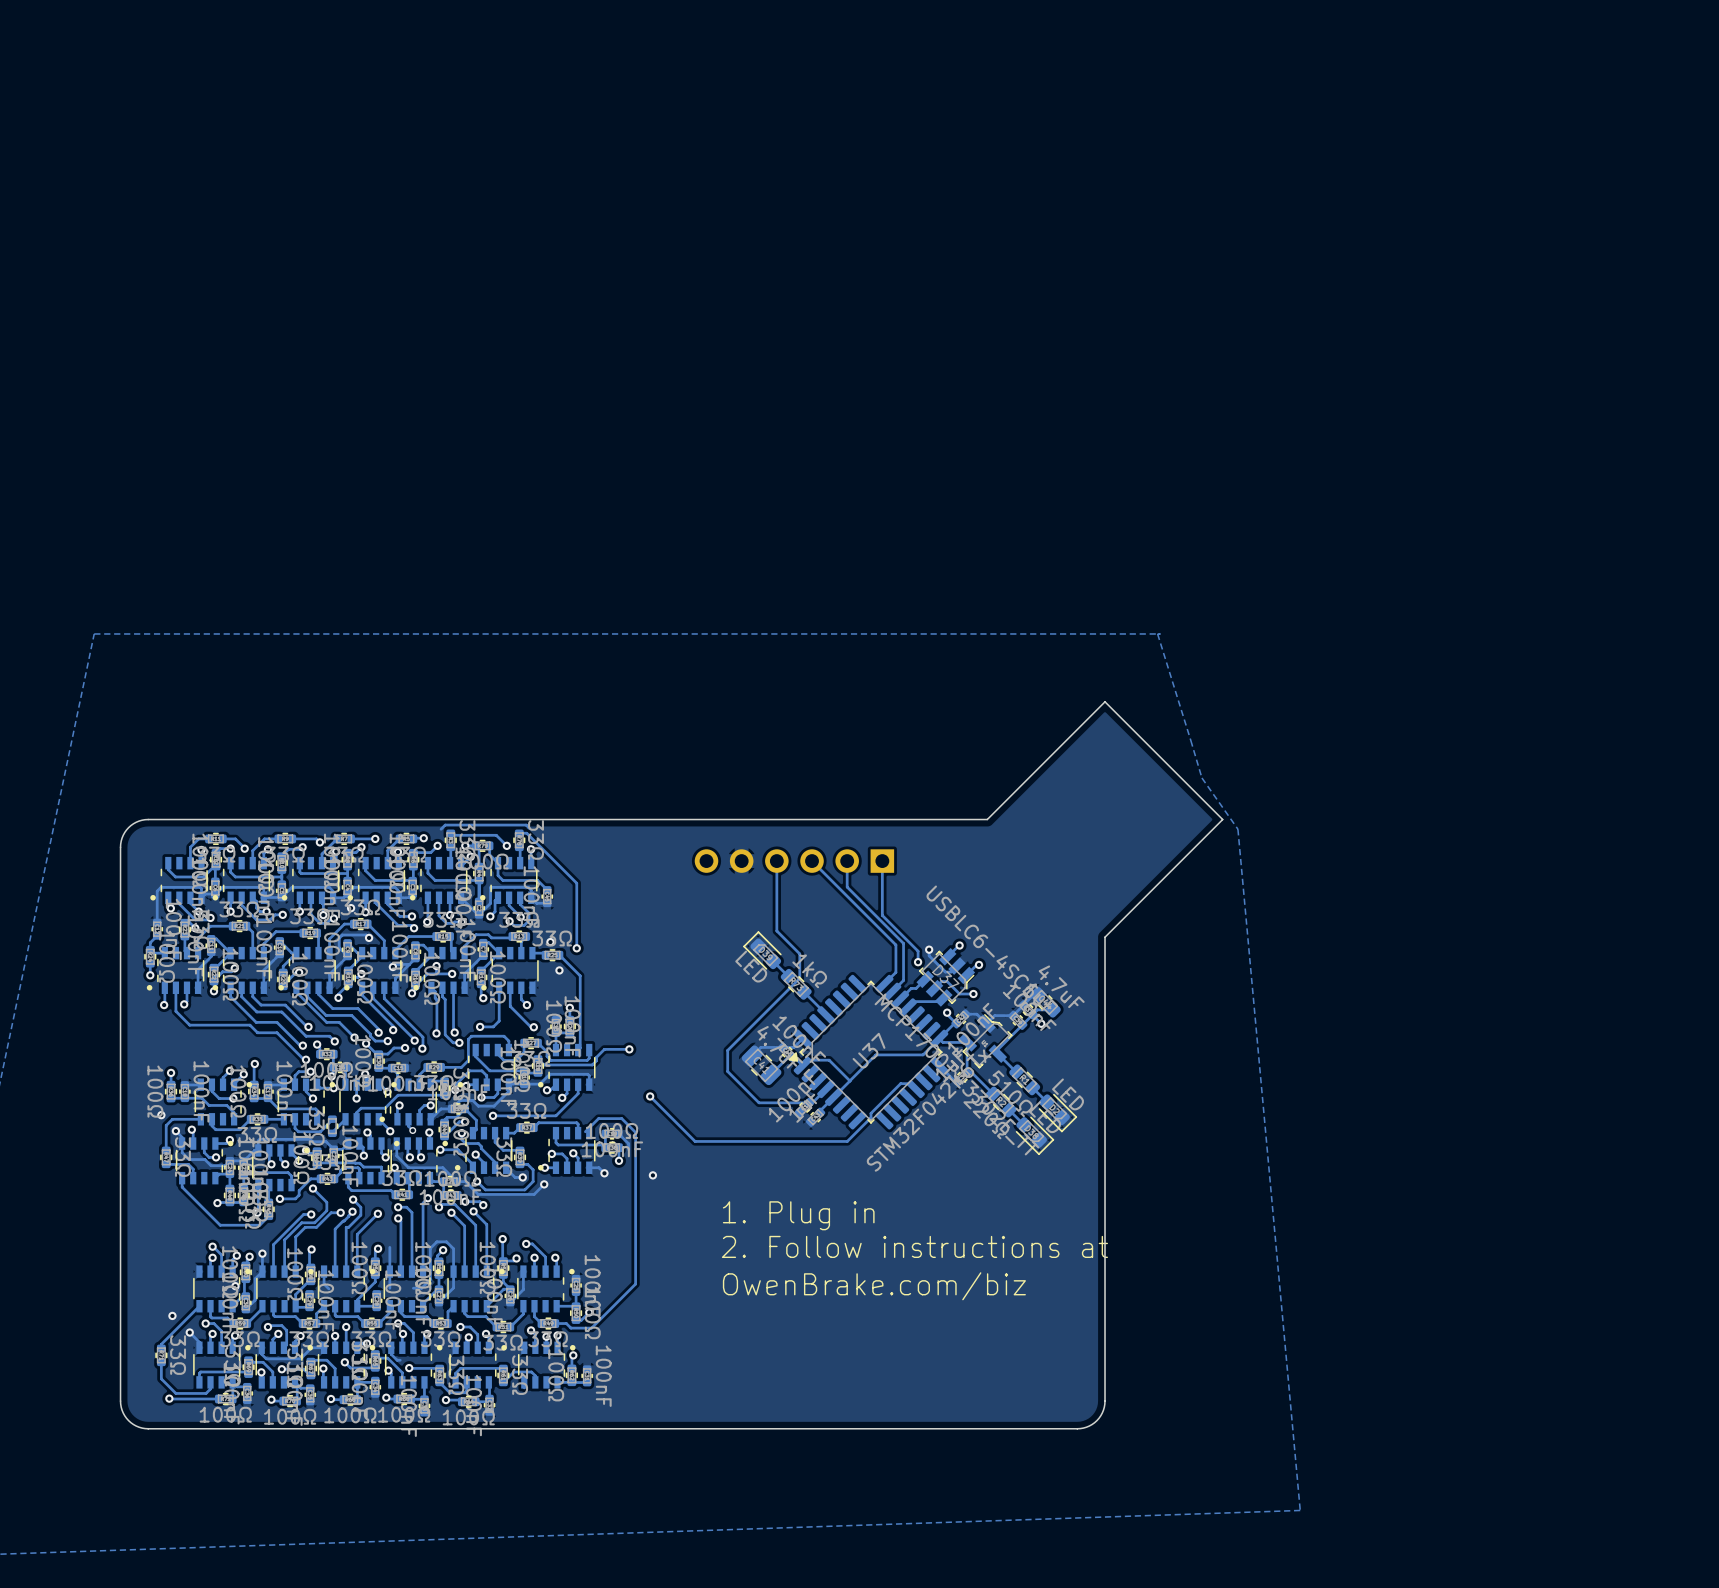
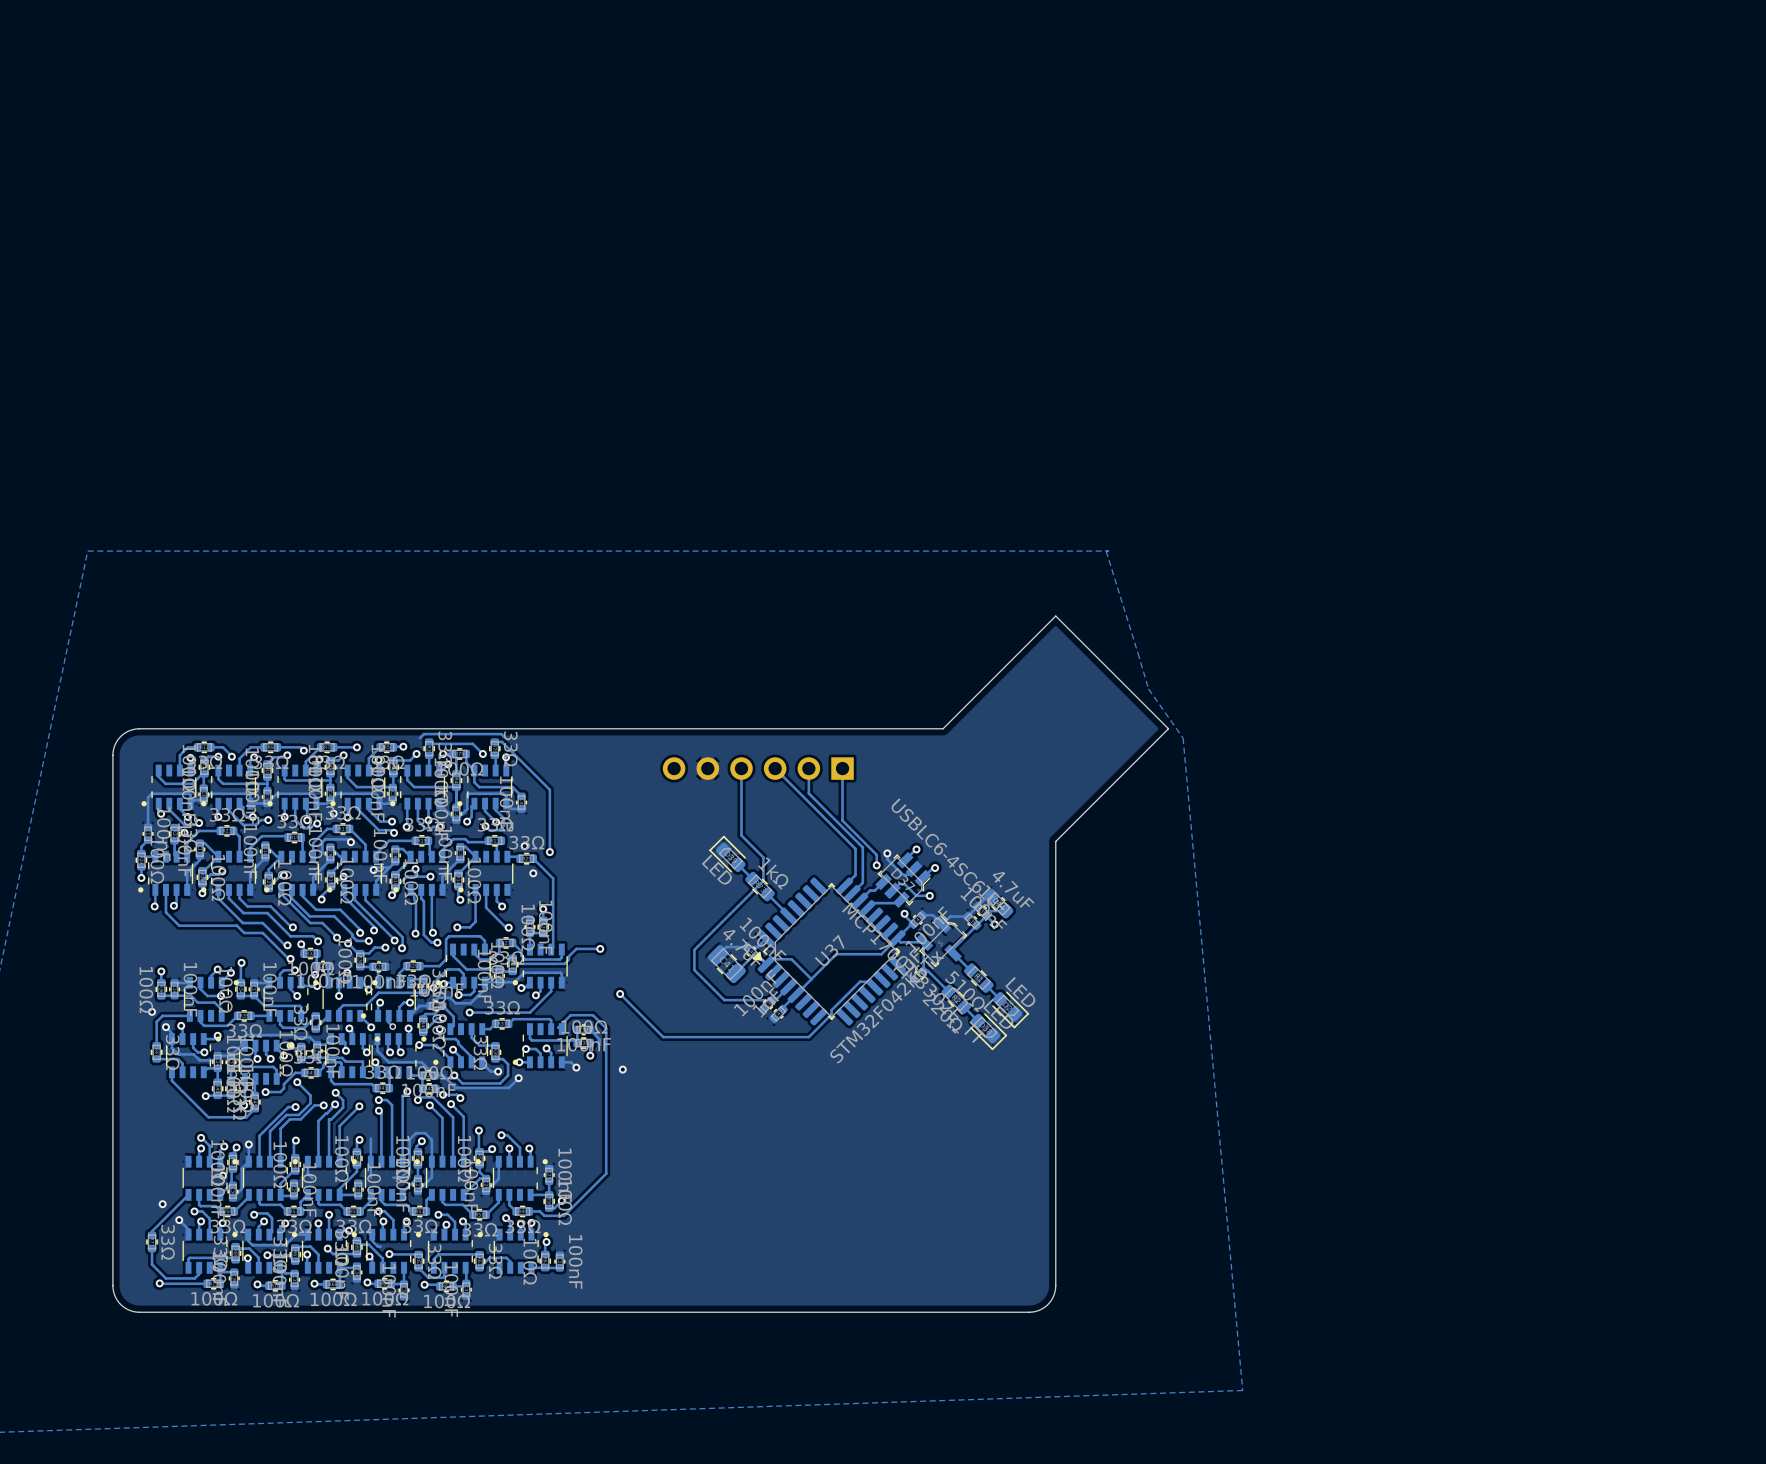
text: 1. Plug in (798, 1215) -> none
text: 2. Follow instructions at (914, 1246) -> none
text: OwenBrake.com/biz (874, 1286) -> none

